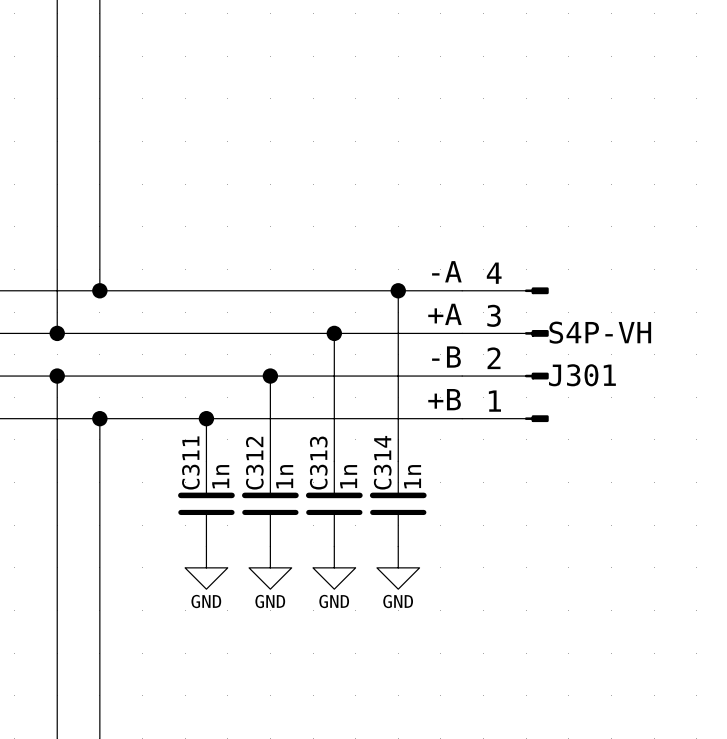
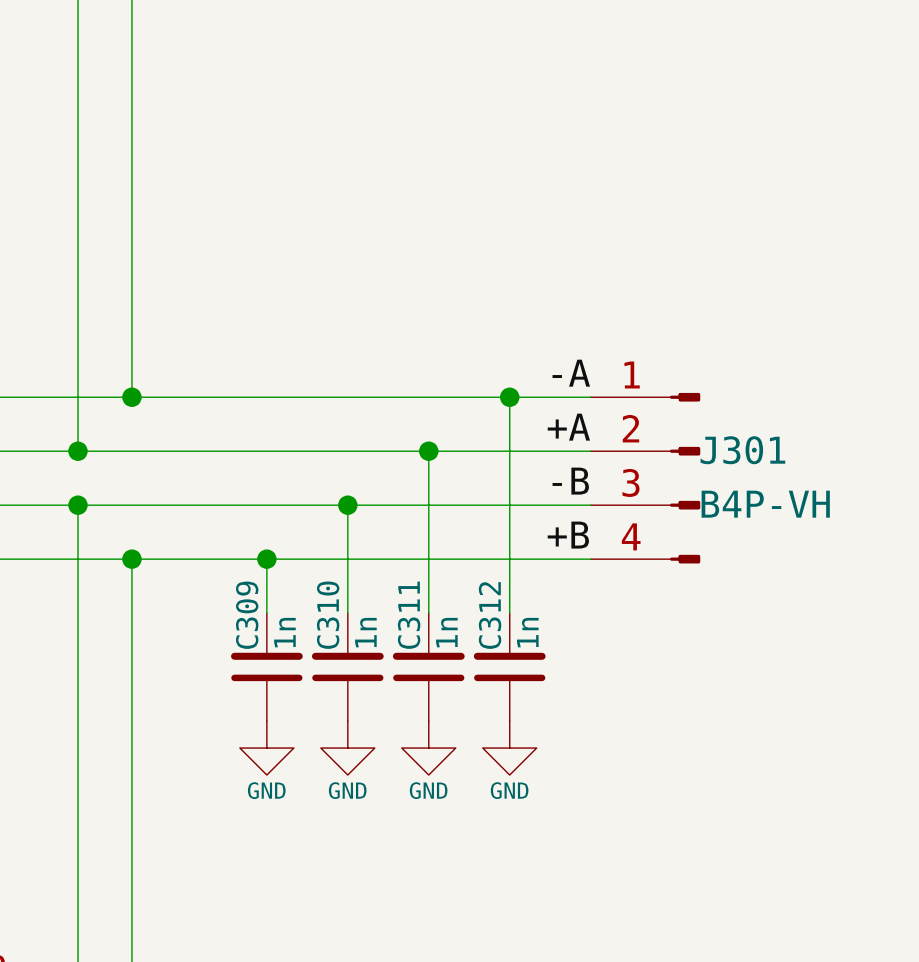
J301 value: S4P-VH (600, 332) -> B4P-VH (765, 504)
J301 flip: as is (536, 354) -> up-down (685, 478)
C311 name: C311 (190, 462) -> C309 (247, 615)
C314 name: C314 (382, 462) -> C312 (490, 615)
C312 name: C312 (254, 463) -> C310 (328, 615)
C313 name: C313 (318, 463) -> C311 (409, 615)

